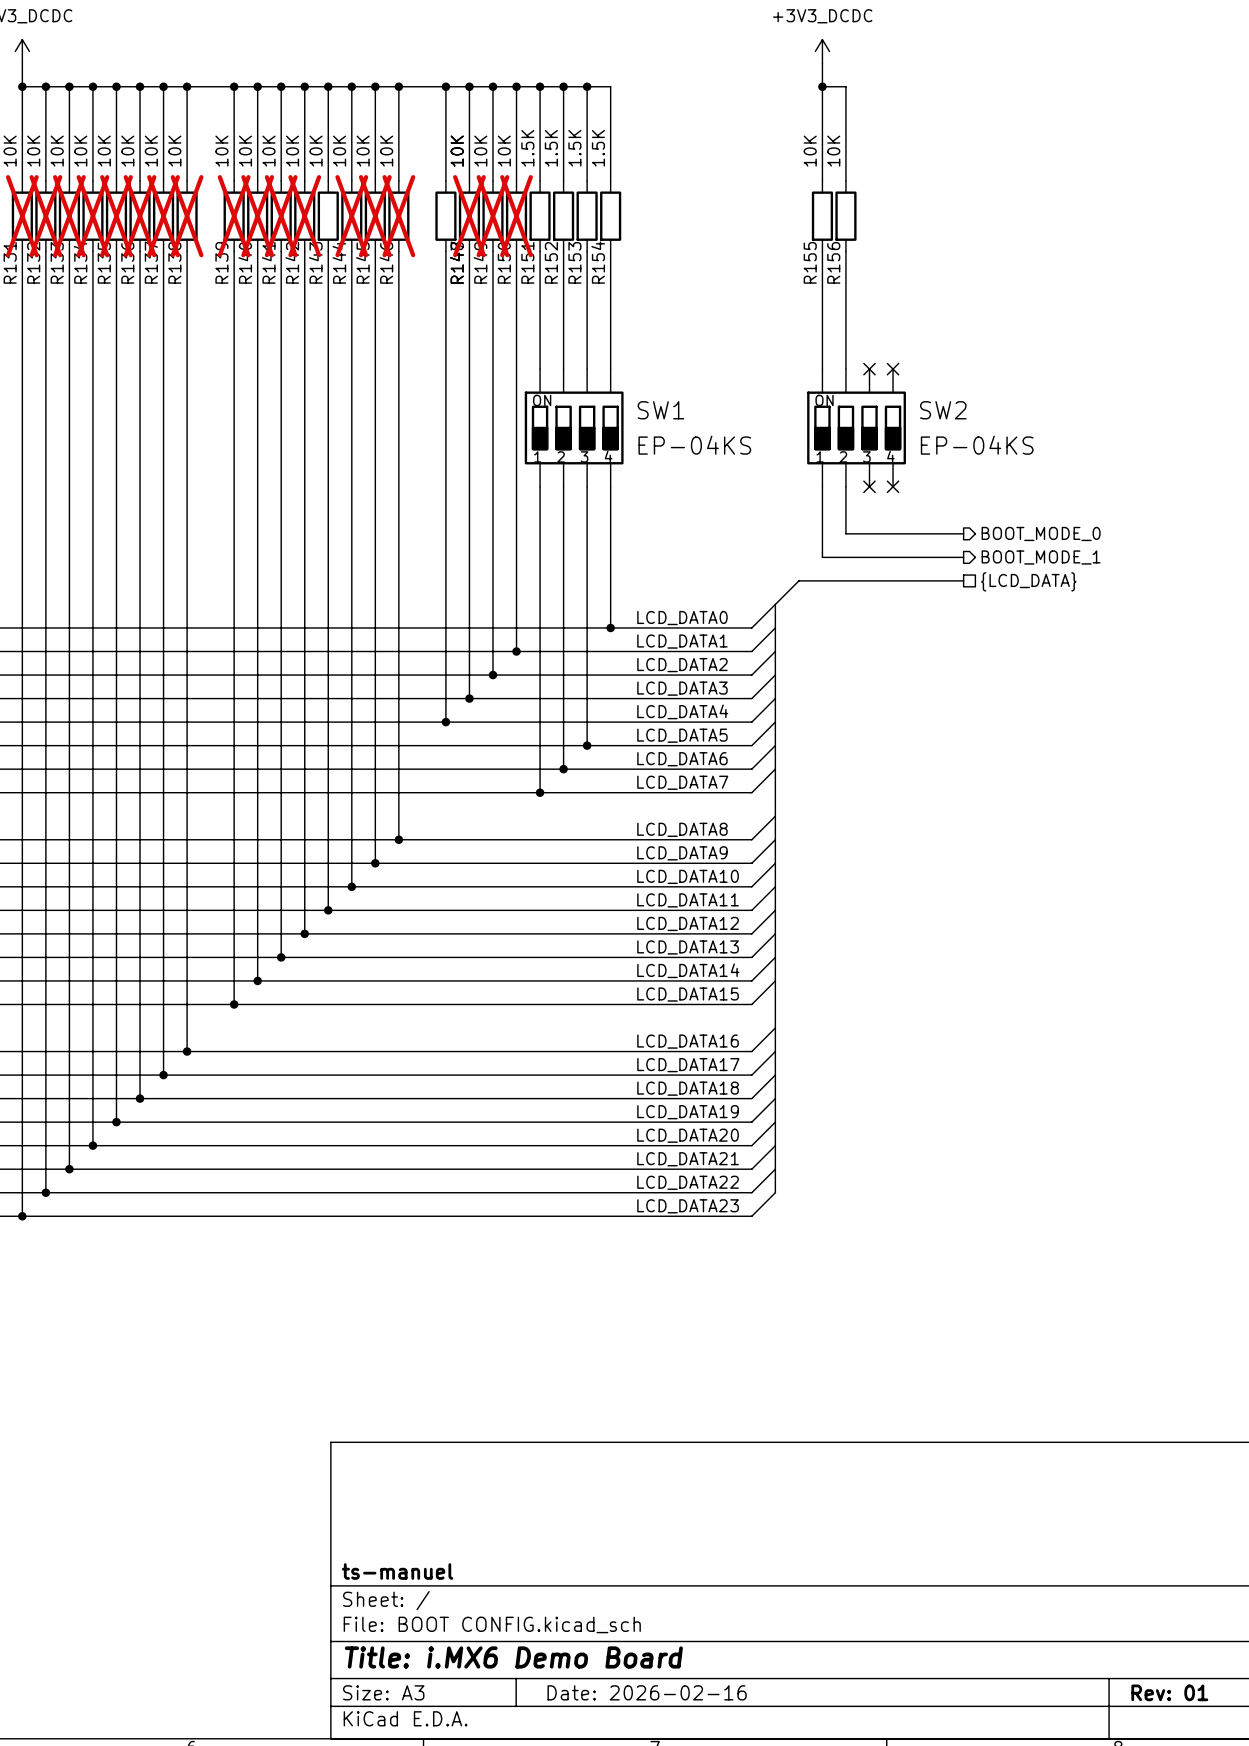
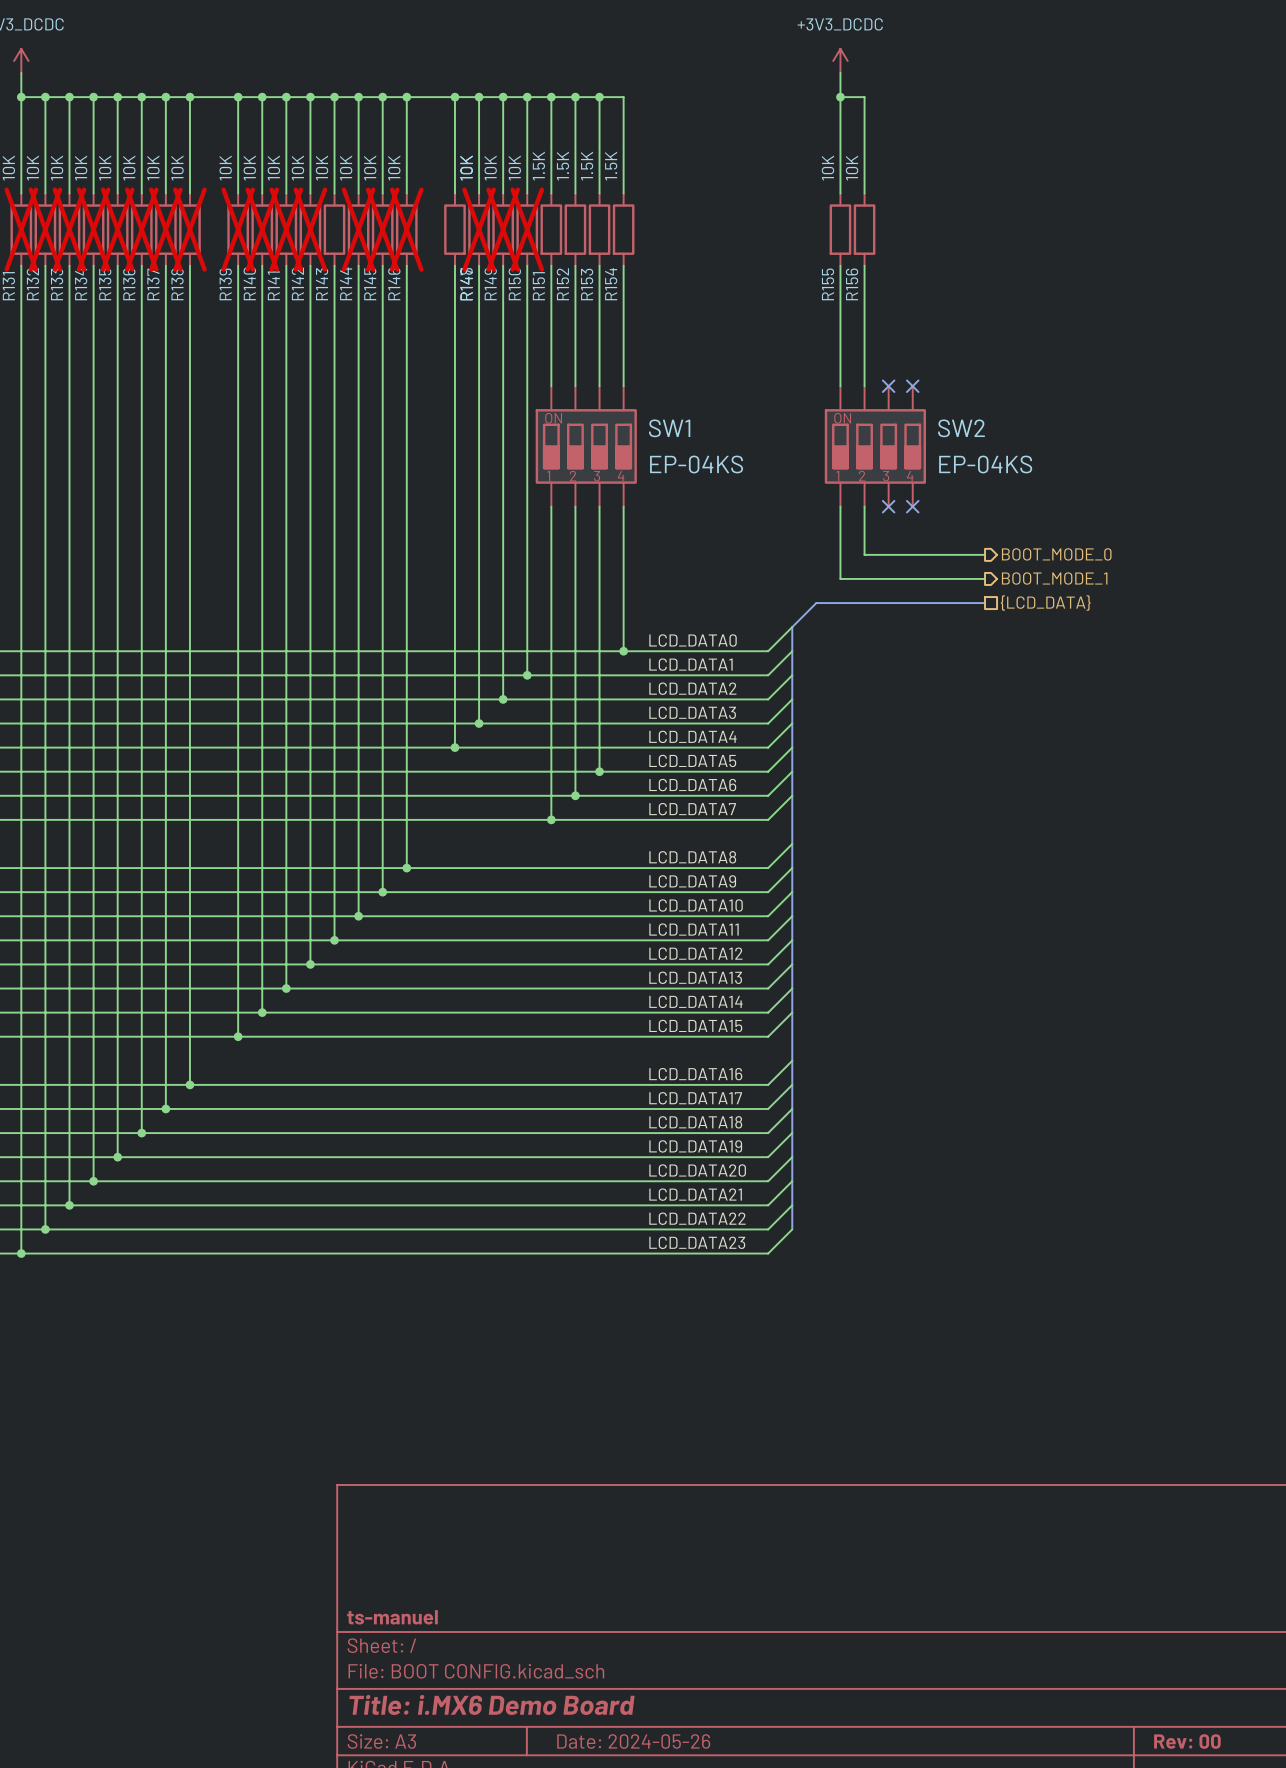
title block: Date: 2026-02-16 (647, 1692) -> Date: 2024-05-26 (633, 1741)
title block: Rev: 01 (1169, 1692) -> Rev: 00 (1187, 1741)

